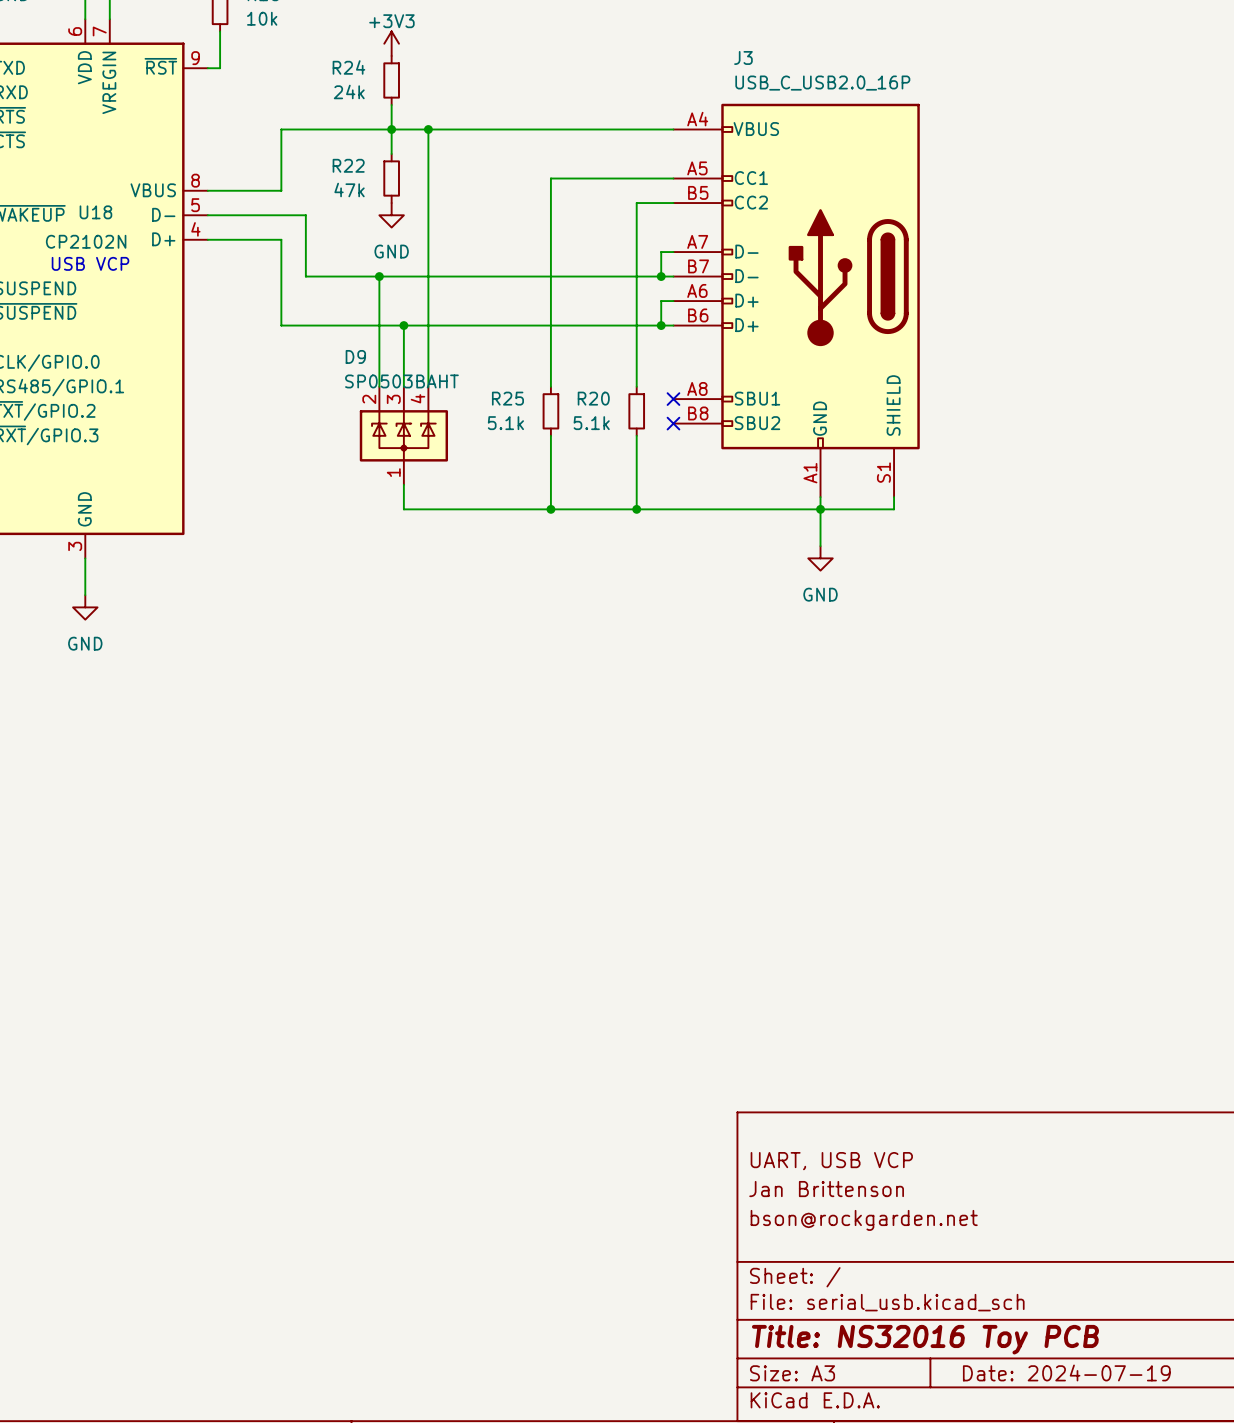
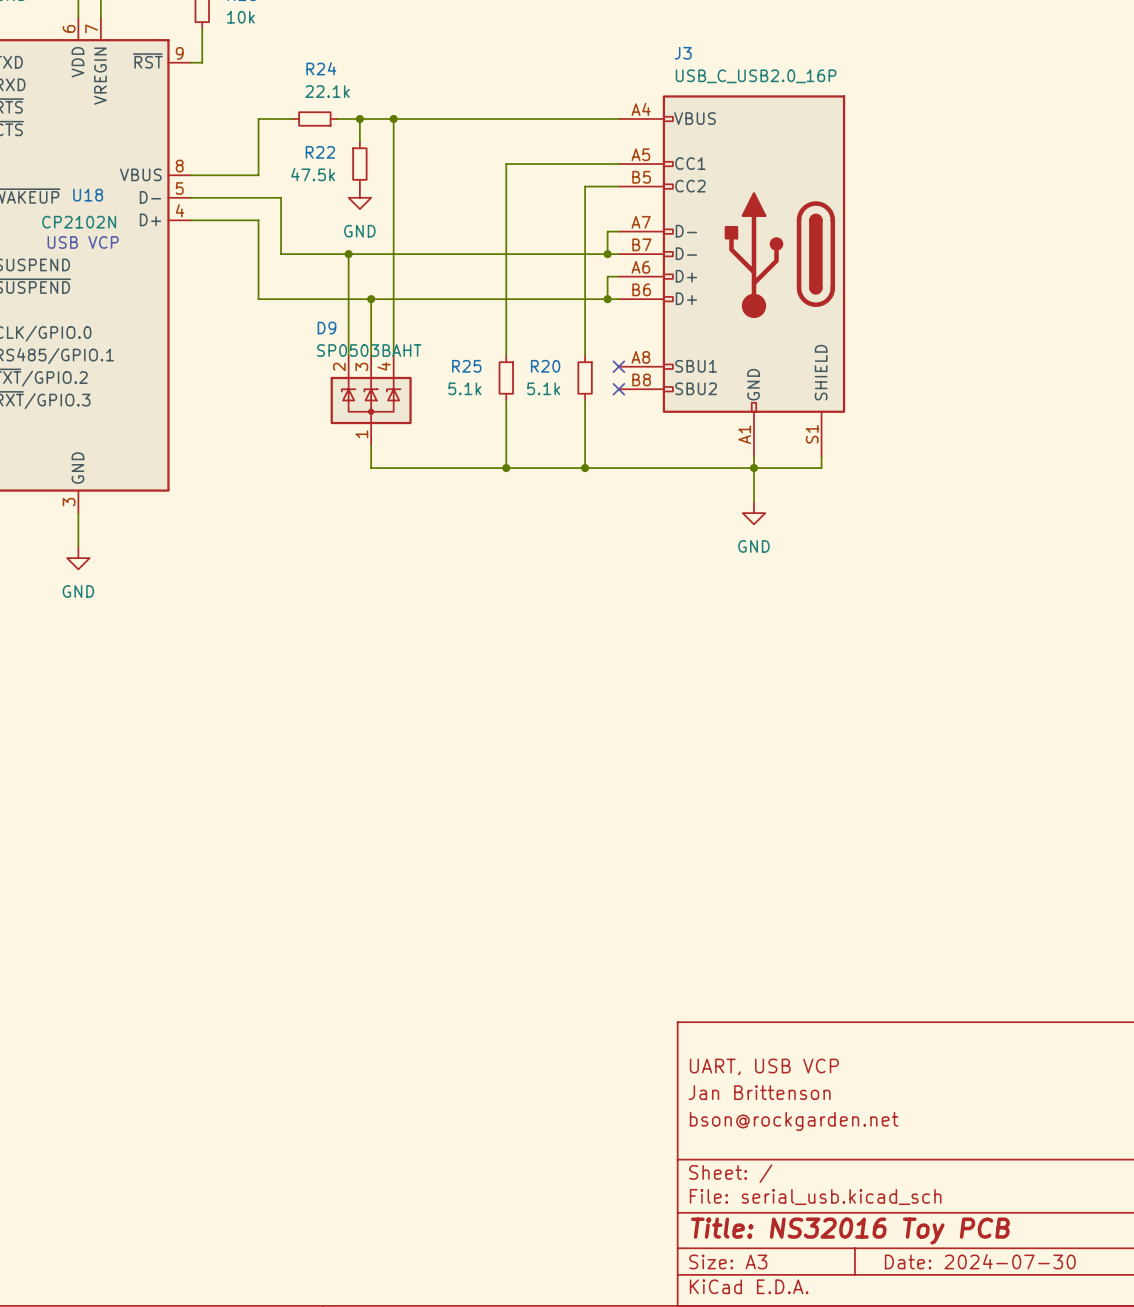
power symbol: +3V3 (391, 43) -> none
R24 rotation: 0° (391, 80) -> 90° clockwise (314, 118)
R24 position: (391, 80) -> (314, 118)
R24 value: 24k (349, 91) -> 22.1k (327, 91)
wire: (391, 104) (391, 129) -> none
wire: (318, 129) (367, 129) -> none
R22 value: 47k (349, 190) -> 47.5k (313, 174)
title block: Date: 2024-07-19 (1066, 1372) -> Date: 2024-07-30 (980, 1261)

